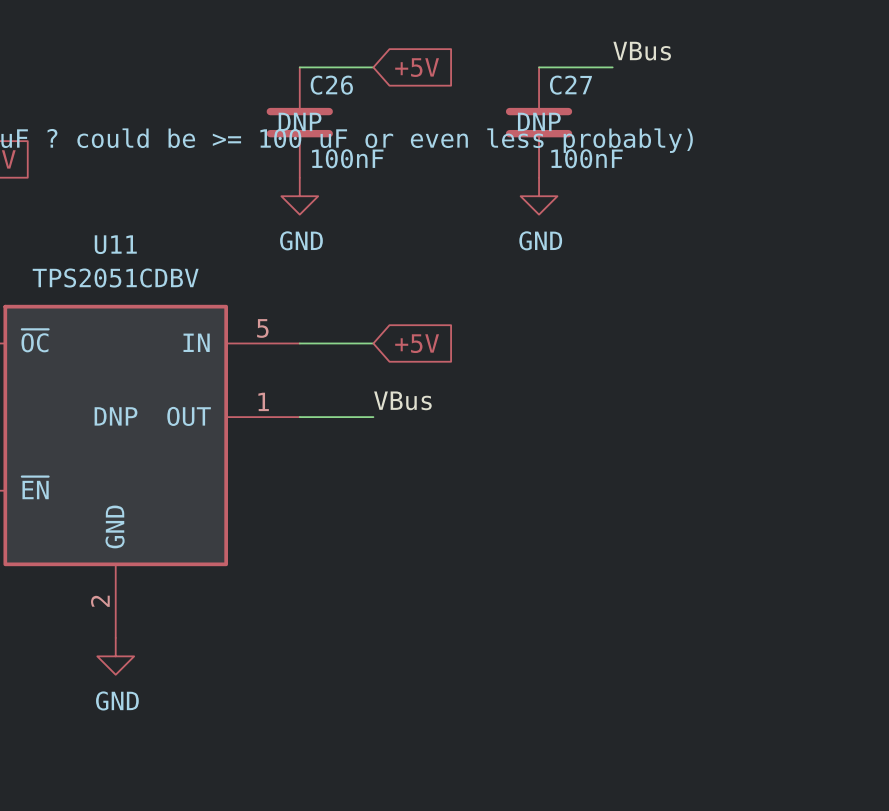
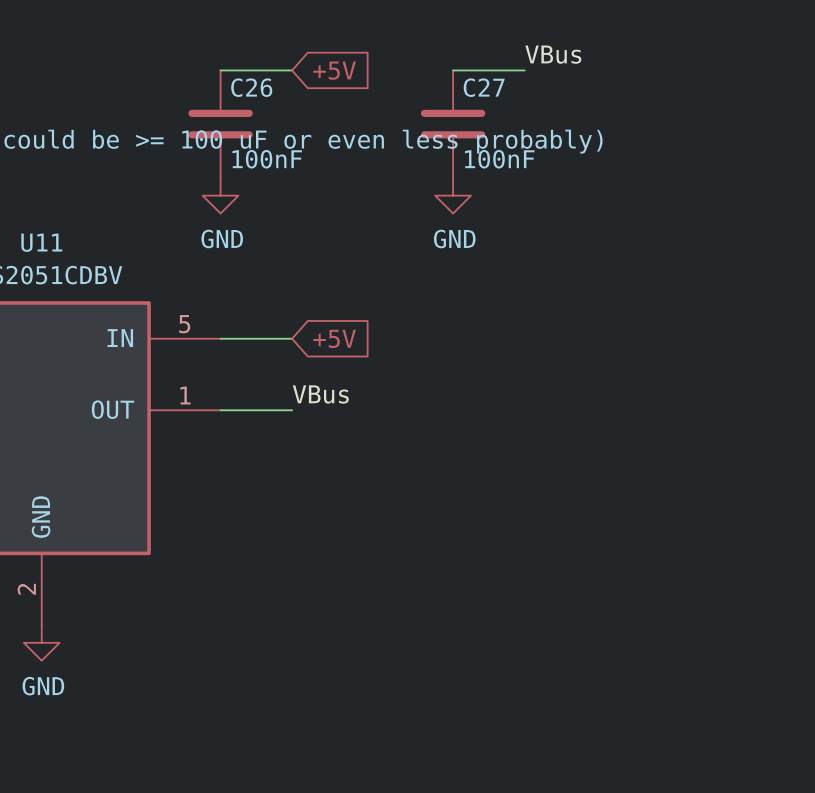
C26 text: DNP (300, 121) -> none
C27 text: DNP (539, 121) -> none
U11 text: DNP (116, 416) -> none

